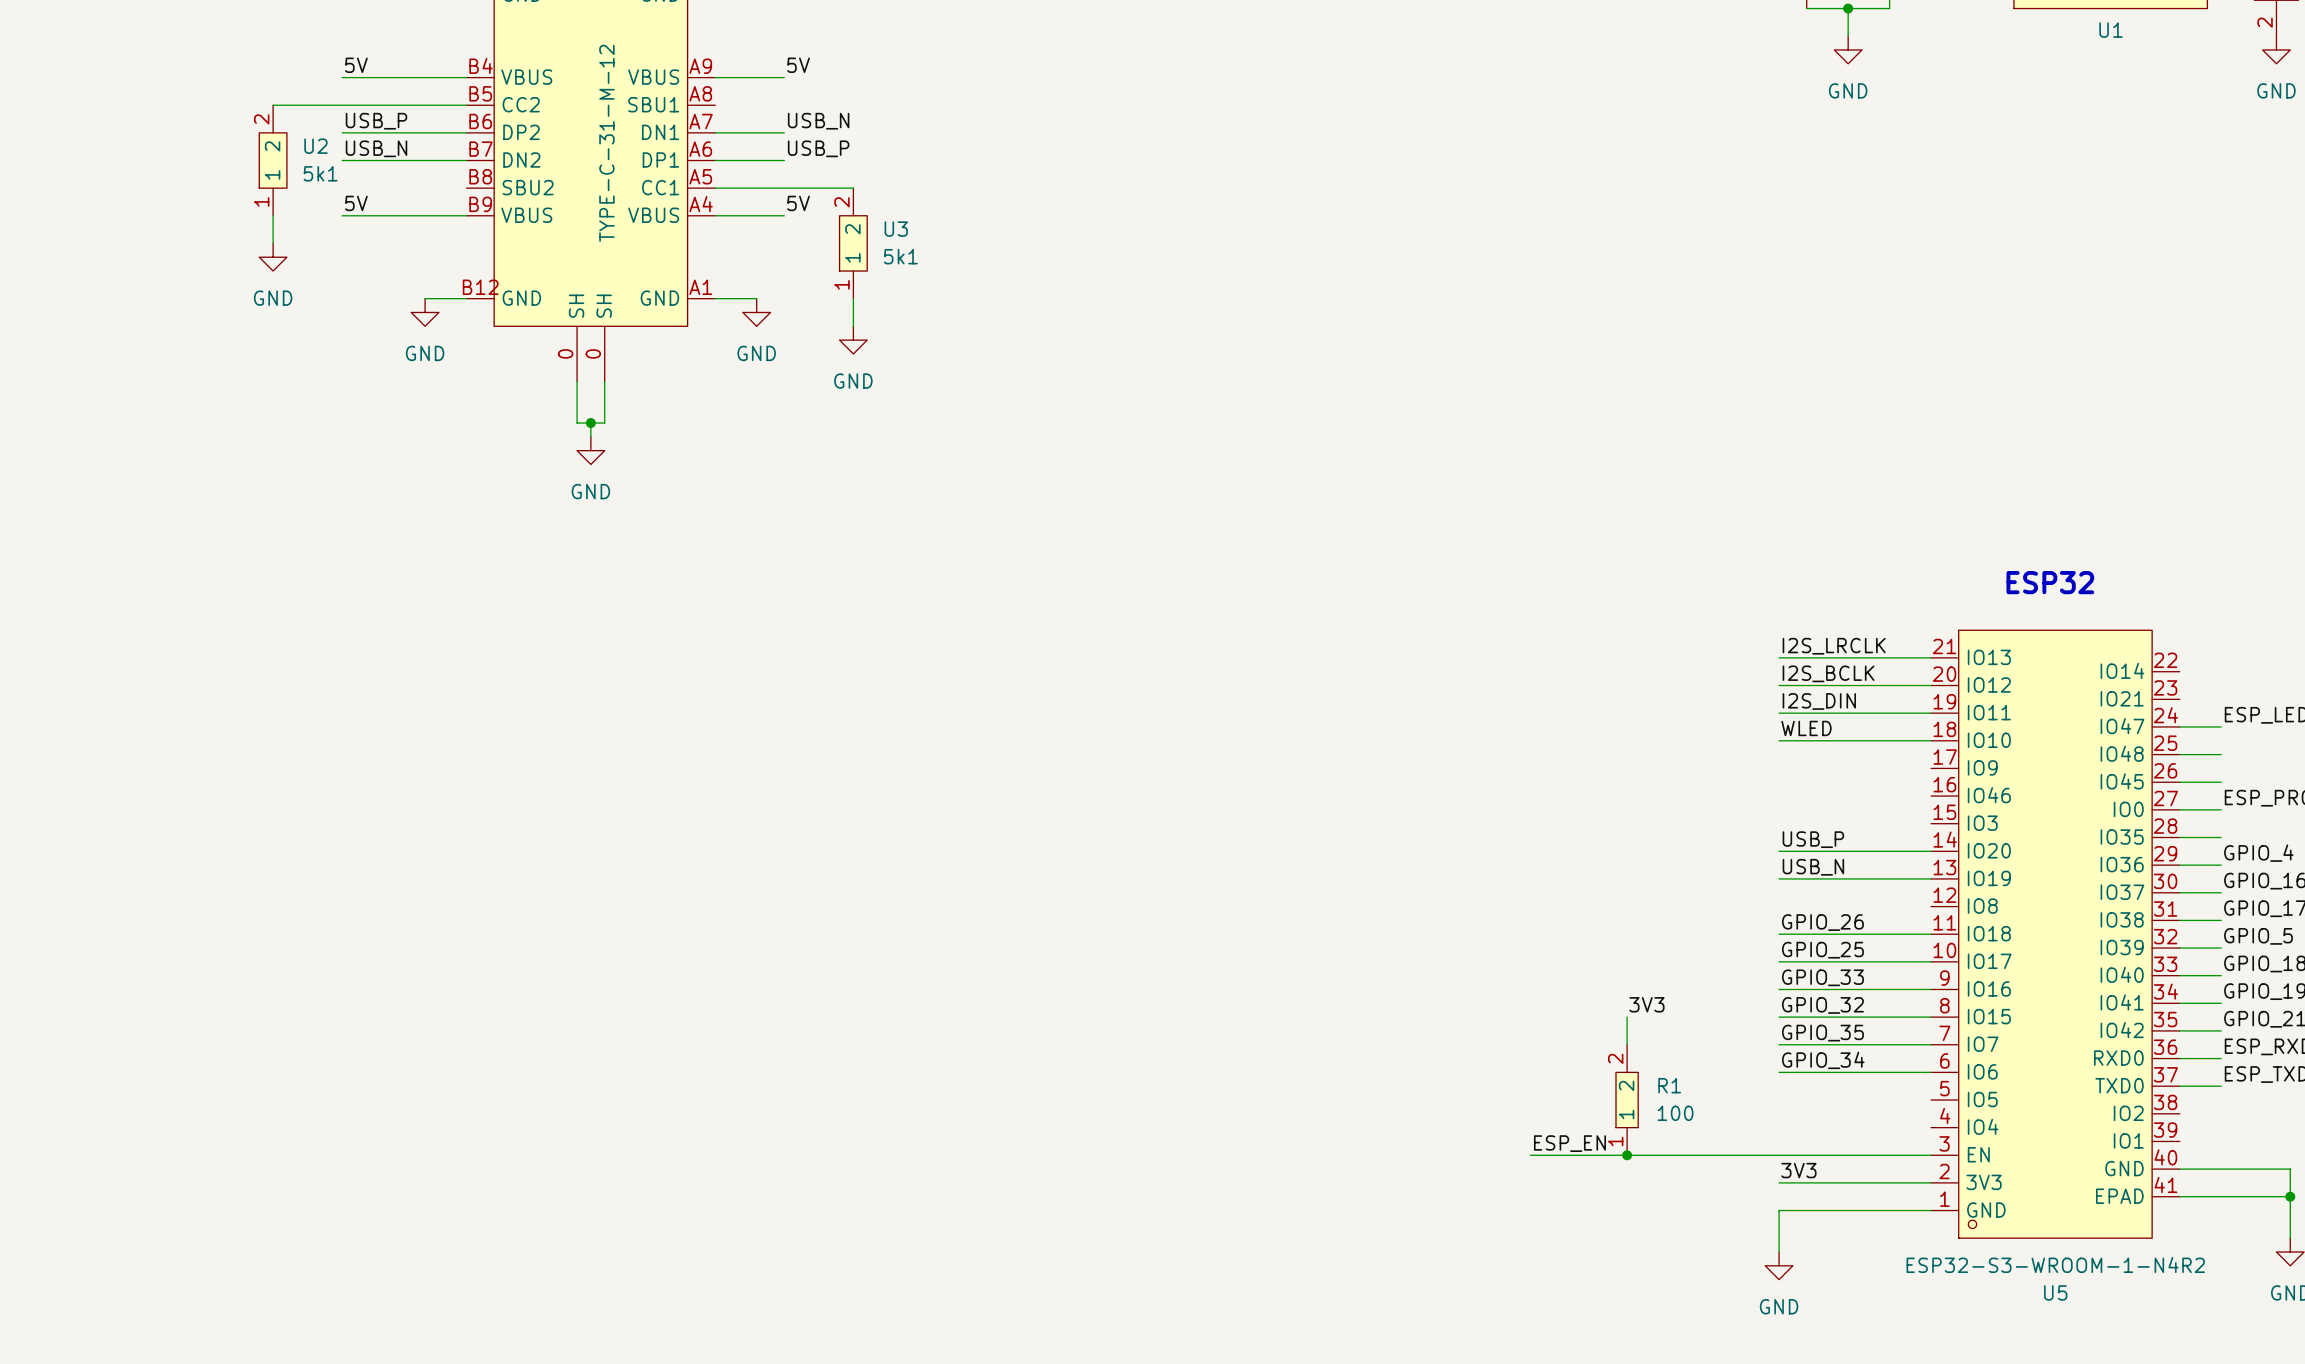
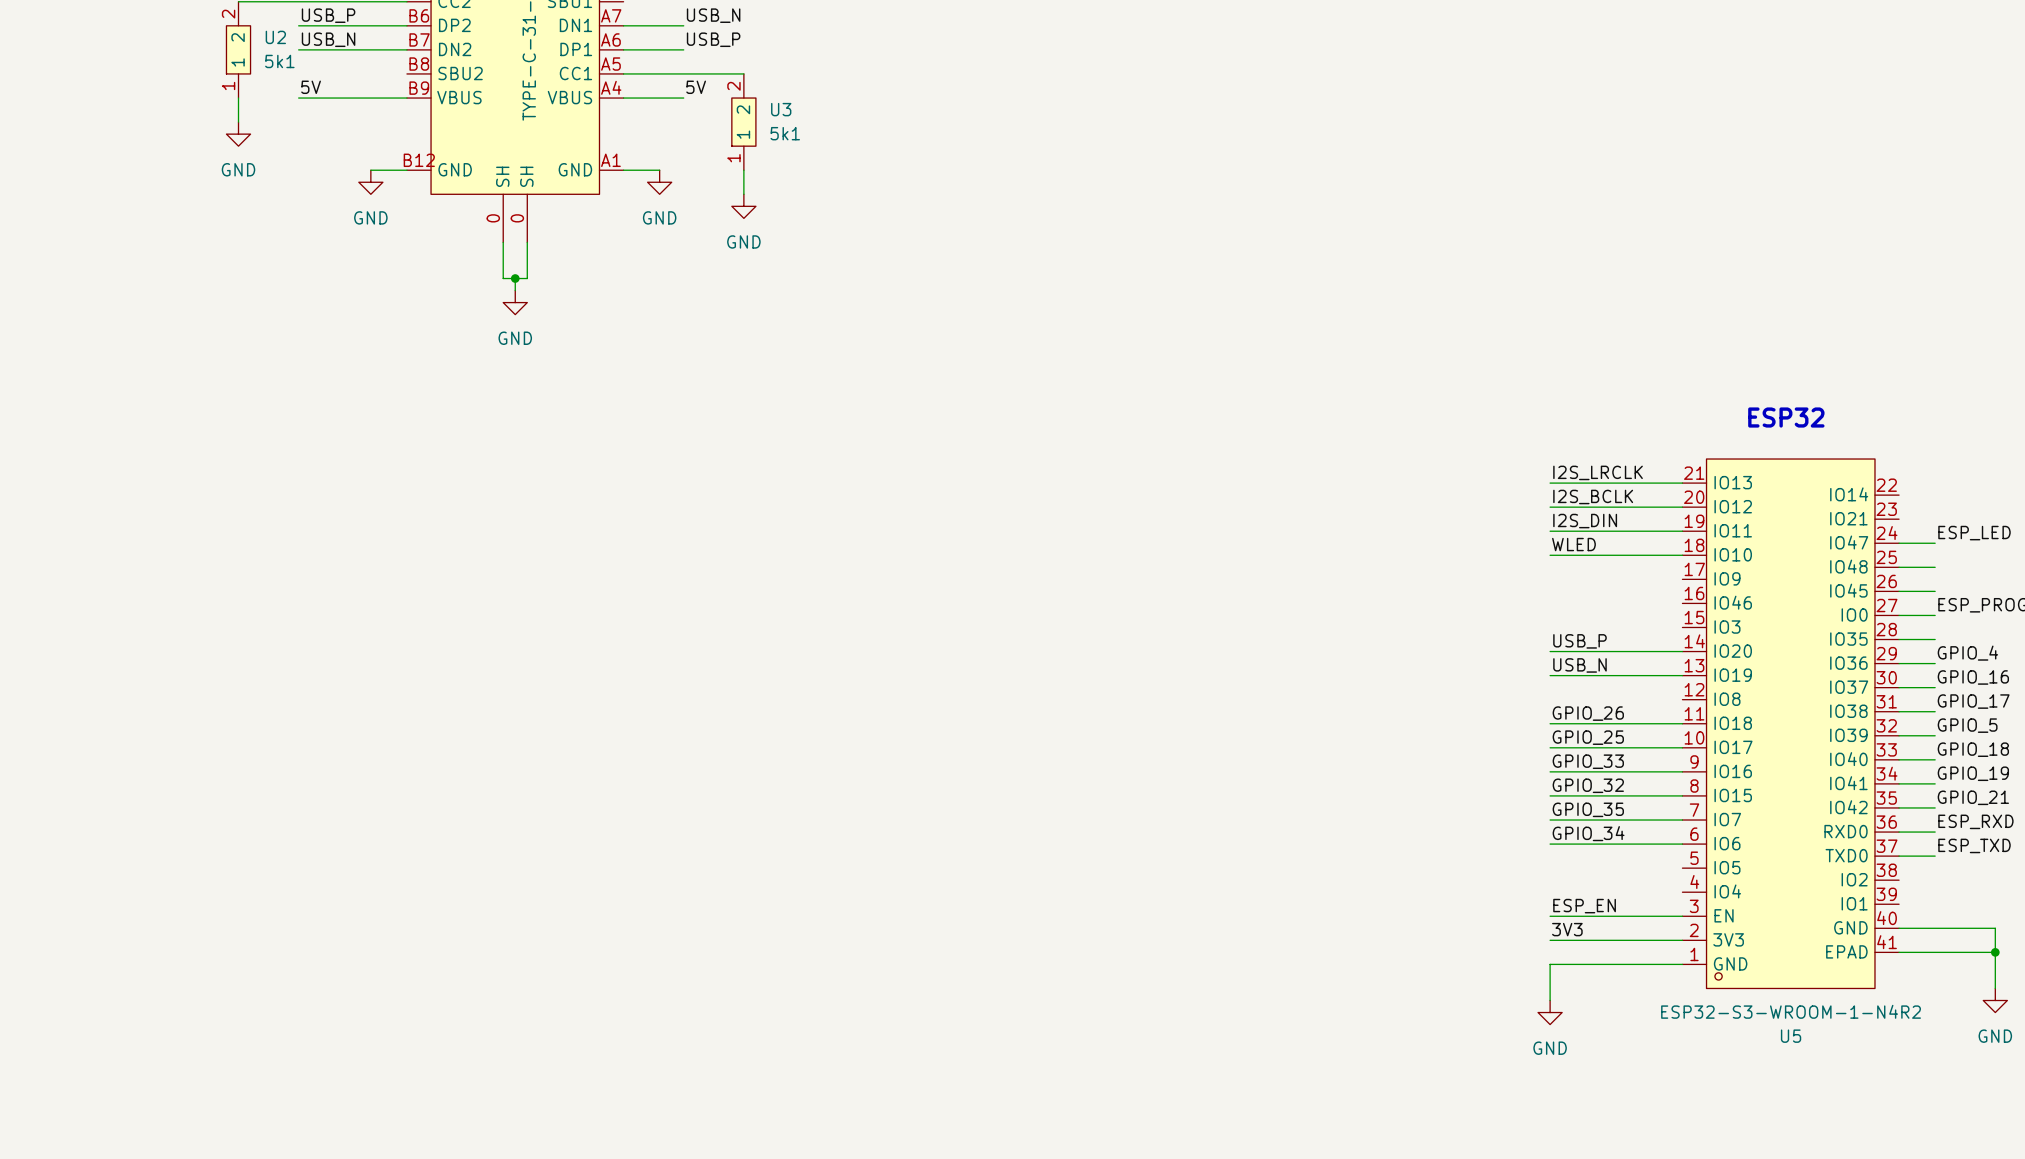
label: 3V3 (1646, 1004) -> none
wire: (1627, 1017) (1627, 1044) -> none
R1: 100 (1627, 1100) -> none
label position: ESP_EN (1569, 1143) -> ESP_EN (1584, 906)
wire: (1530, 1155) (1779, 1155) -> none
junction: (1627, 1155) -> none

